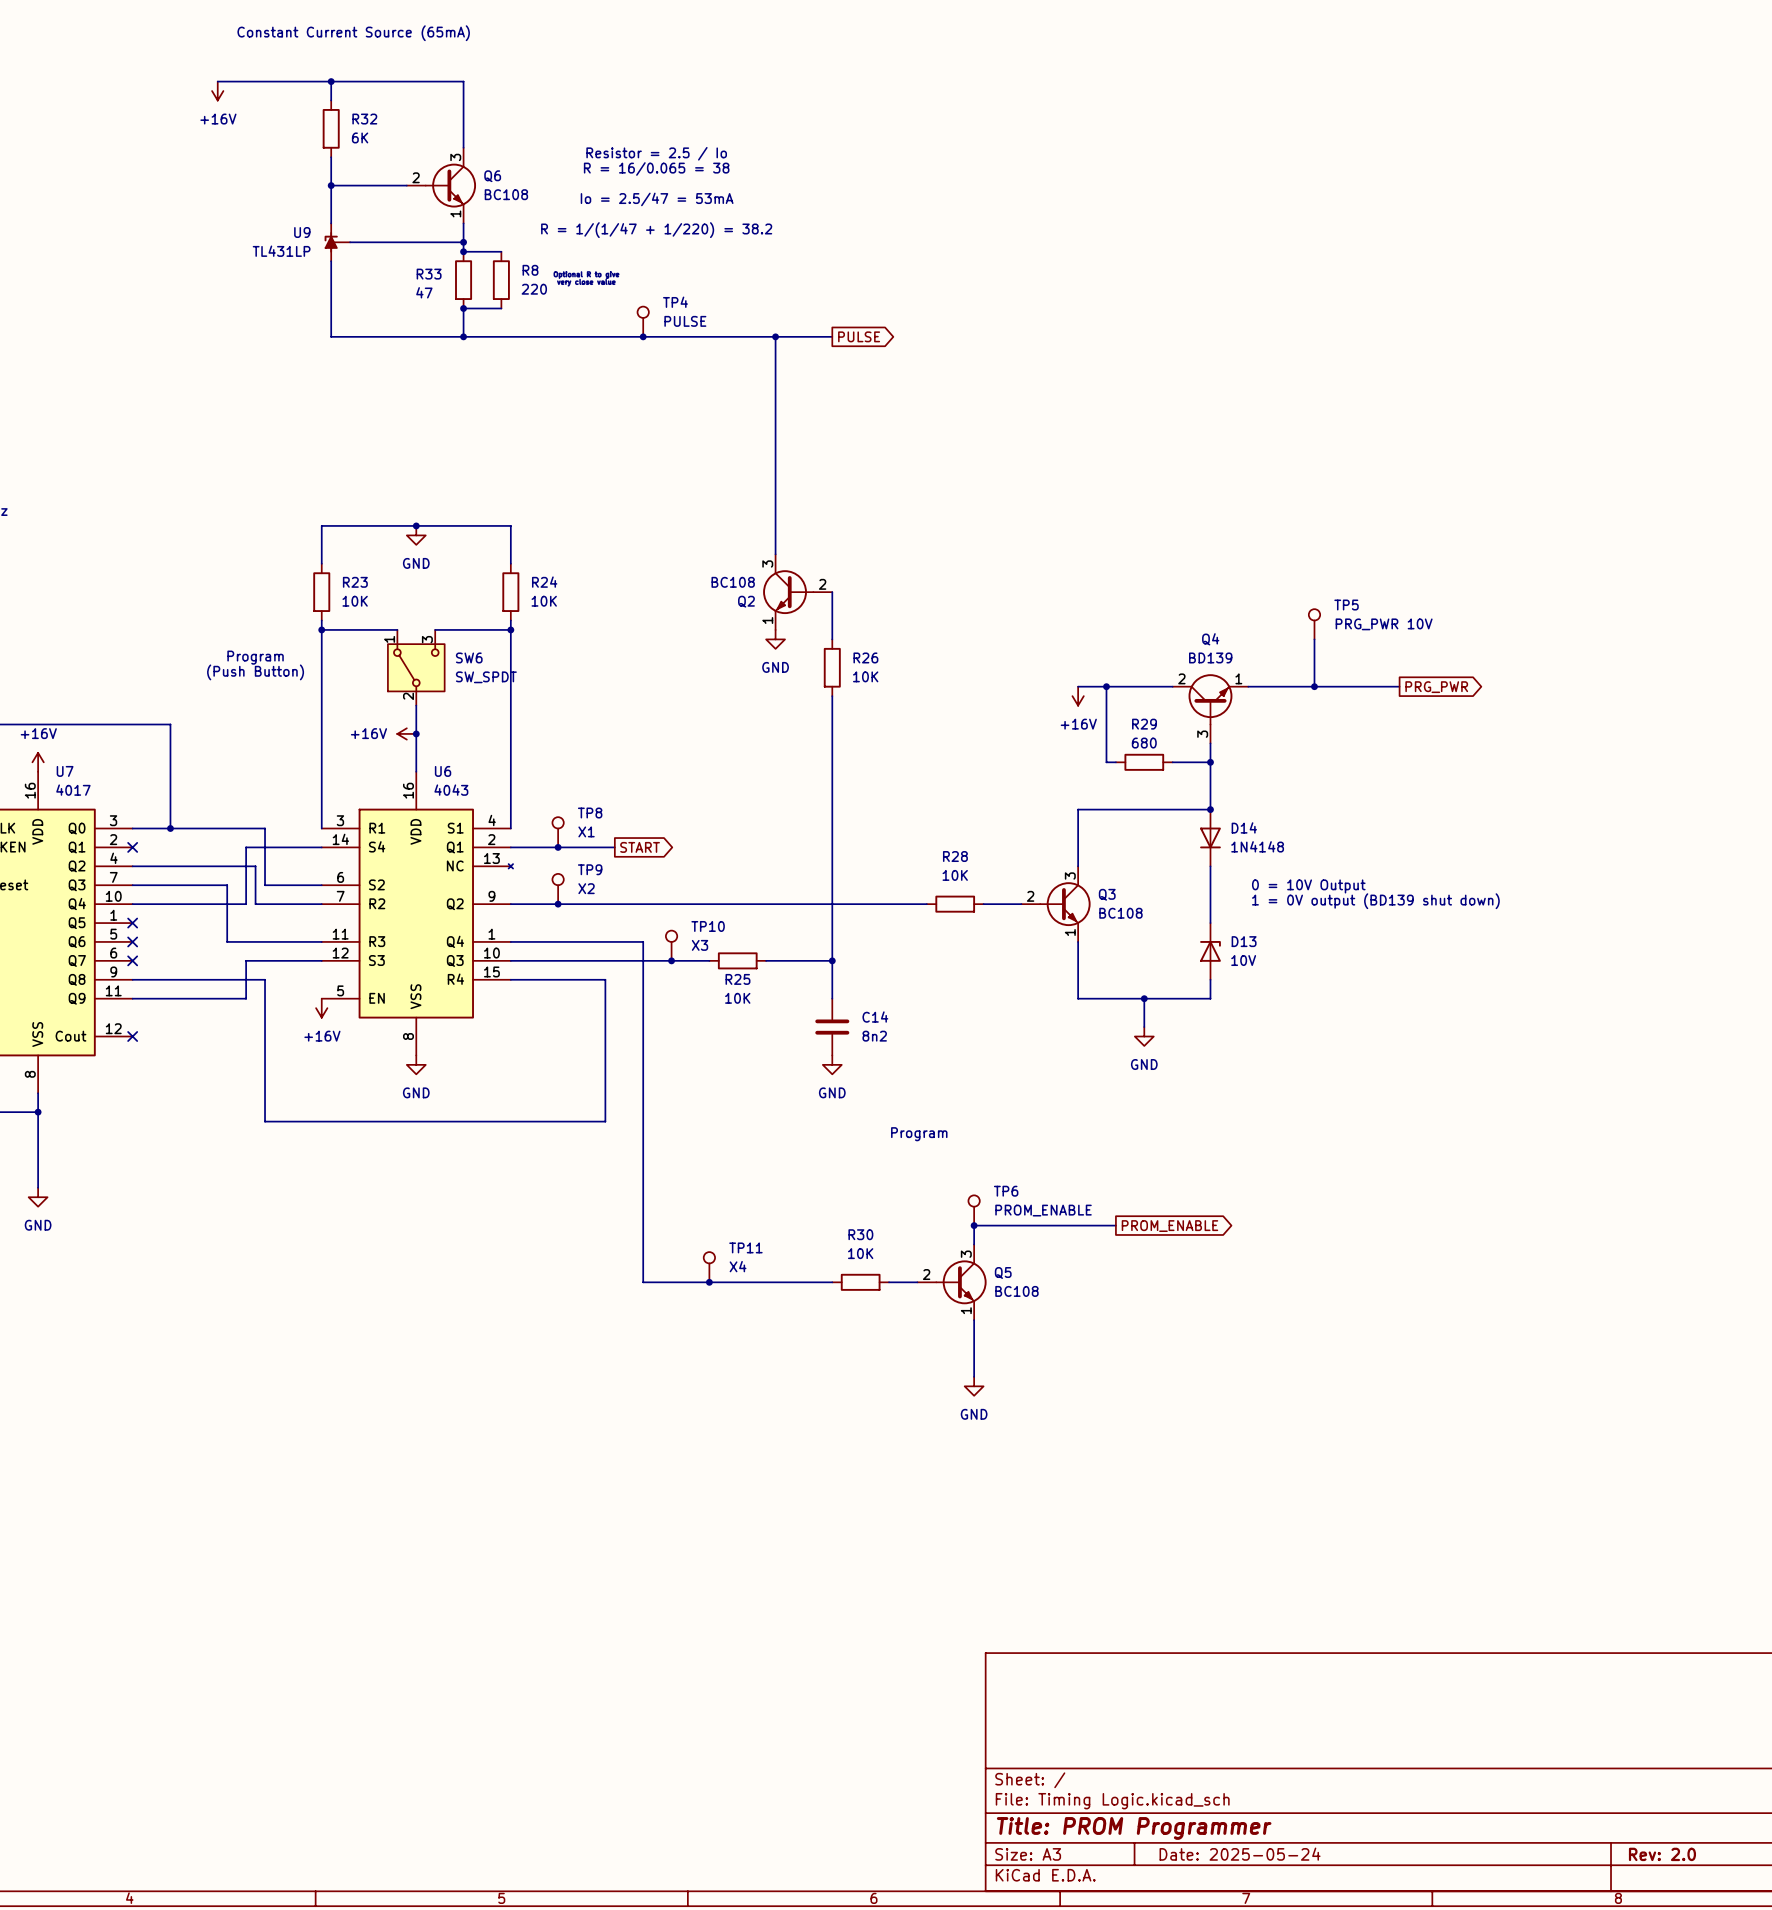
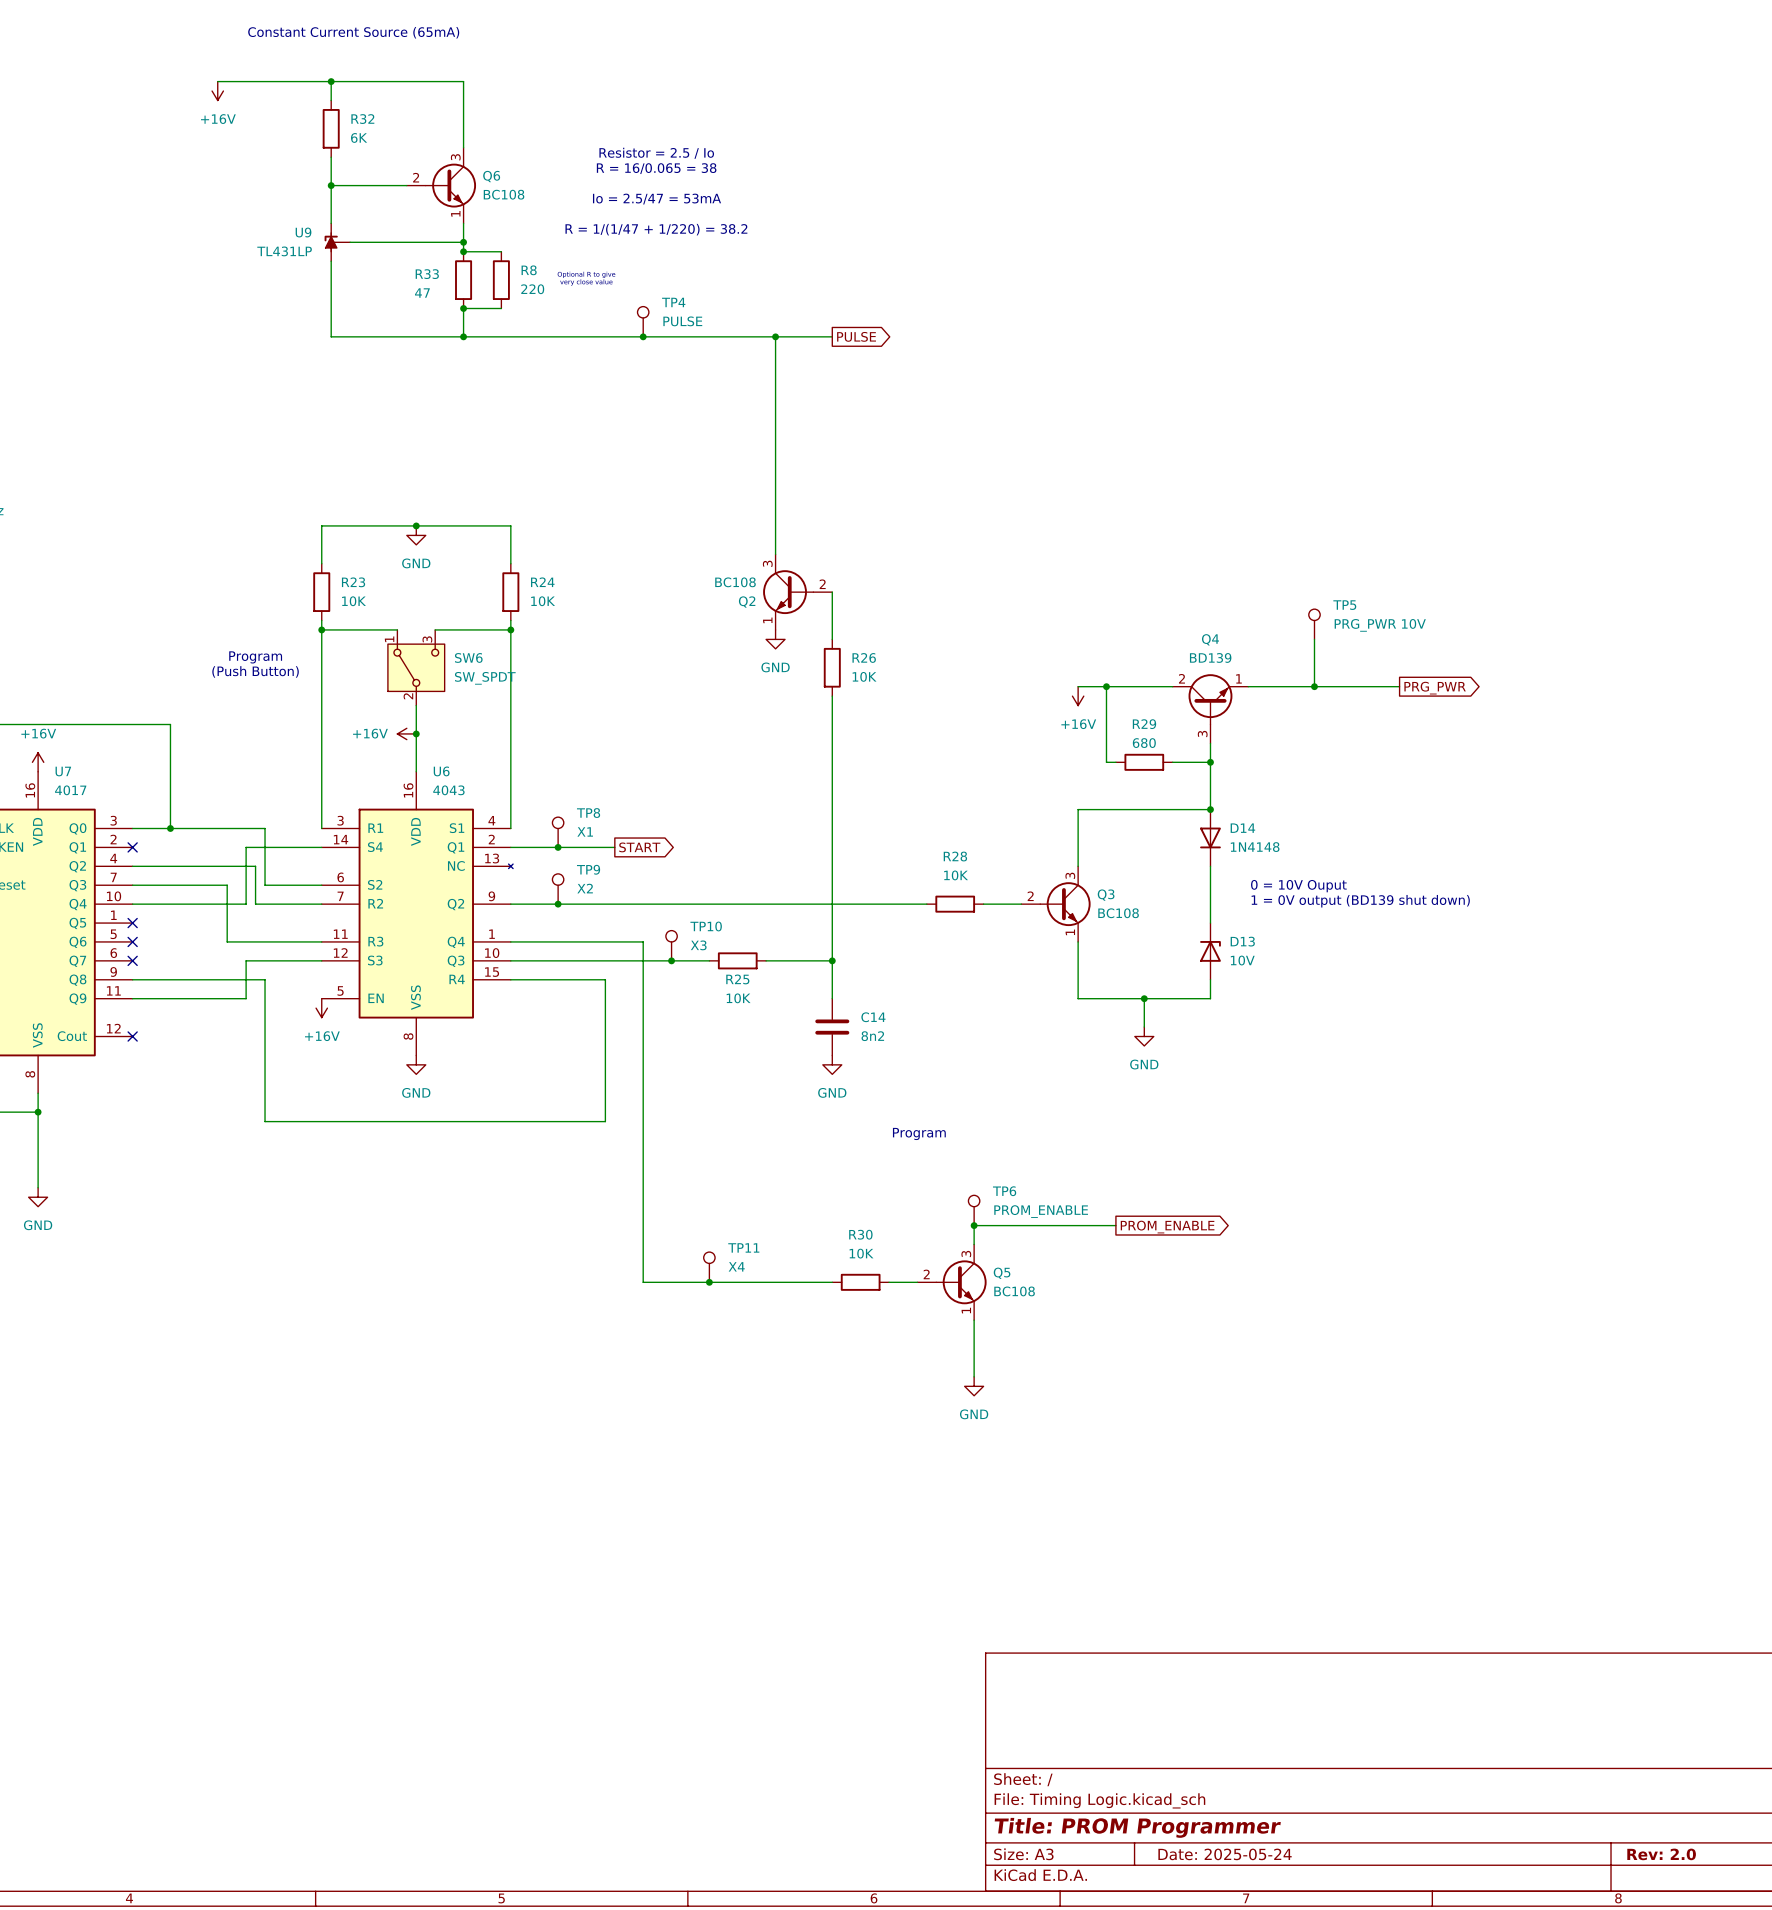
text: 0 = 10V Output (1308, 886) -> 0 = 10V Ouput (1298, 886)

